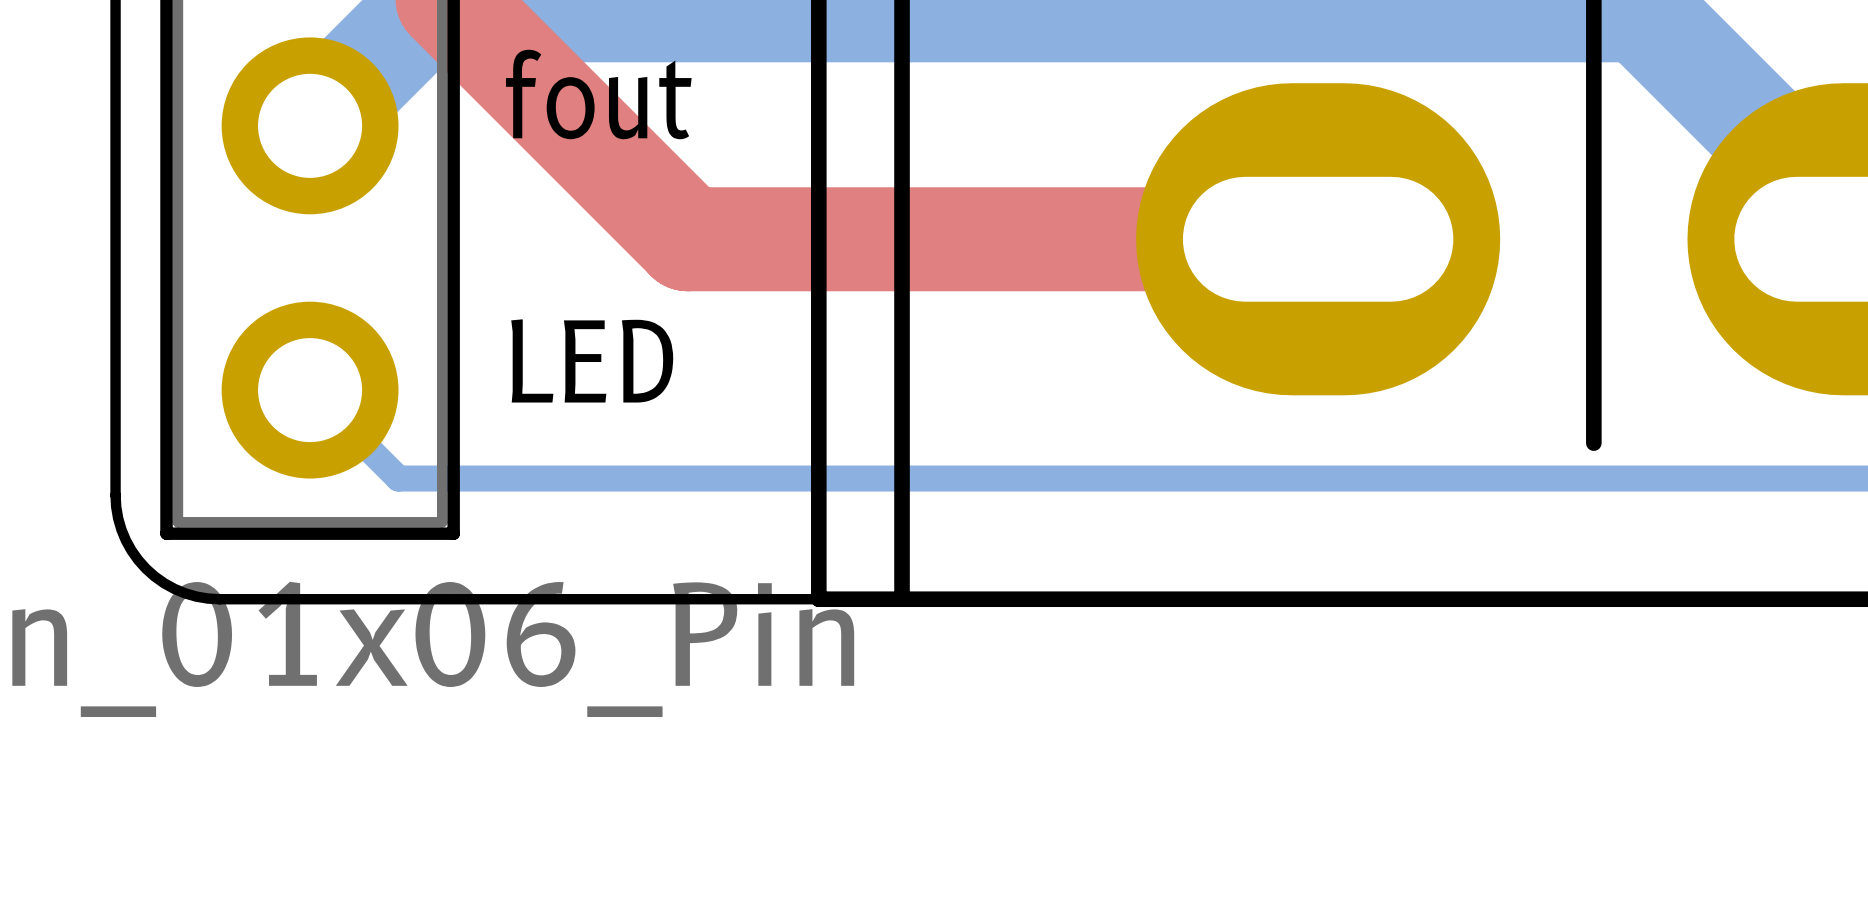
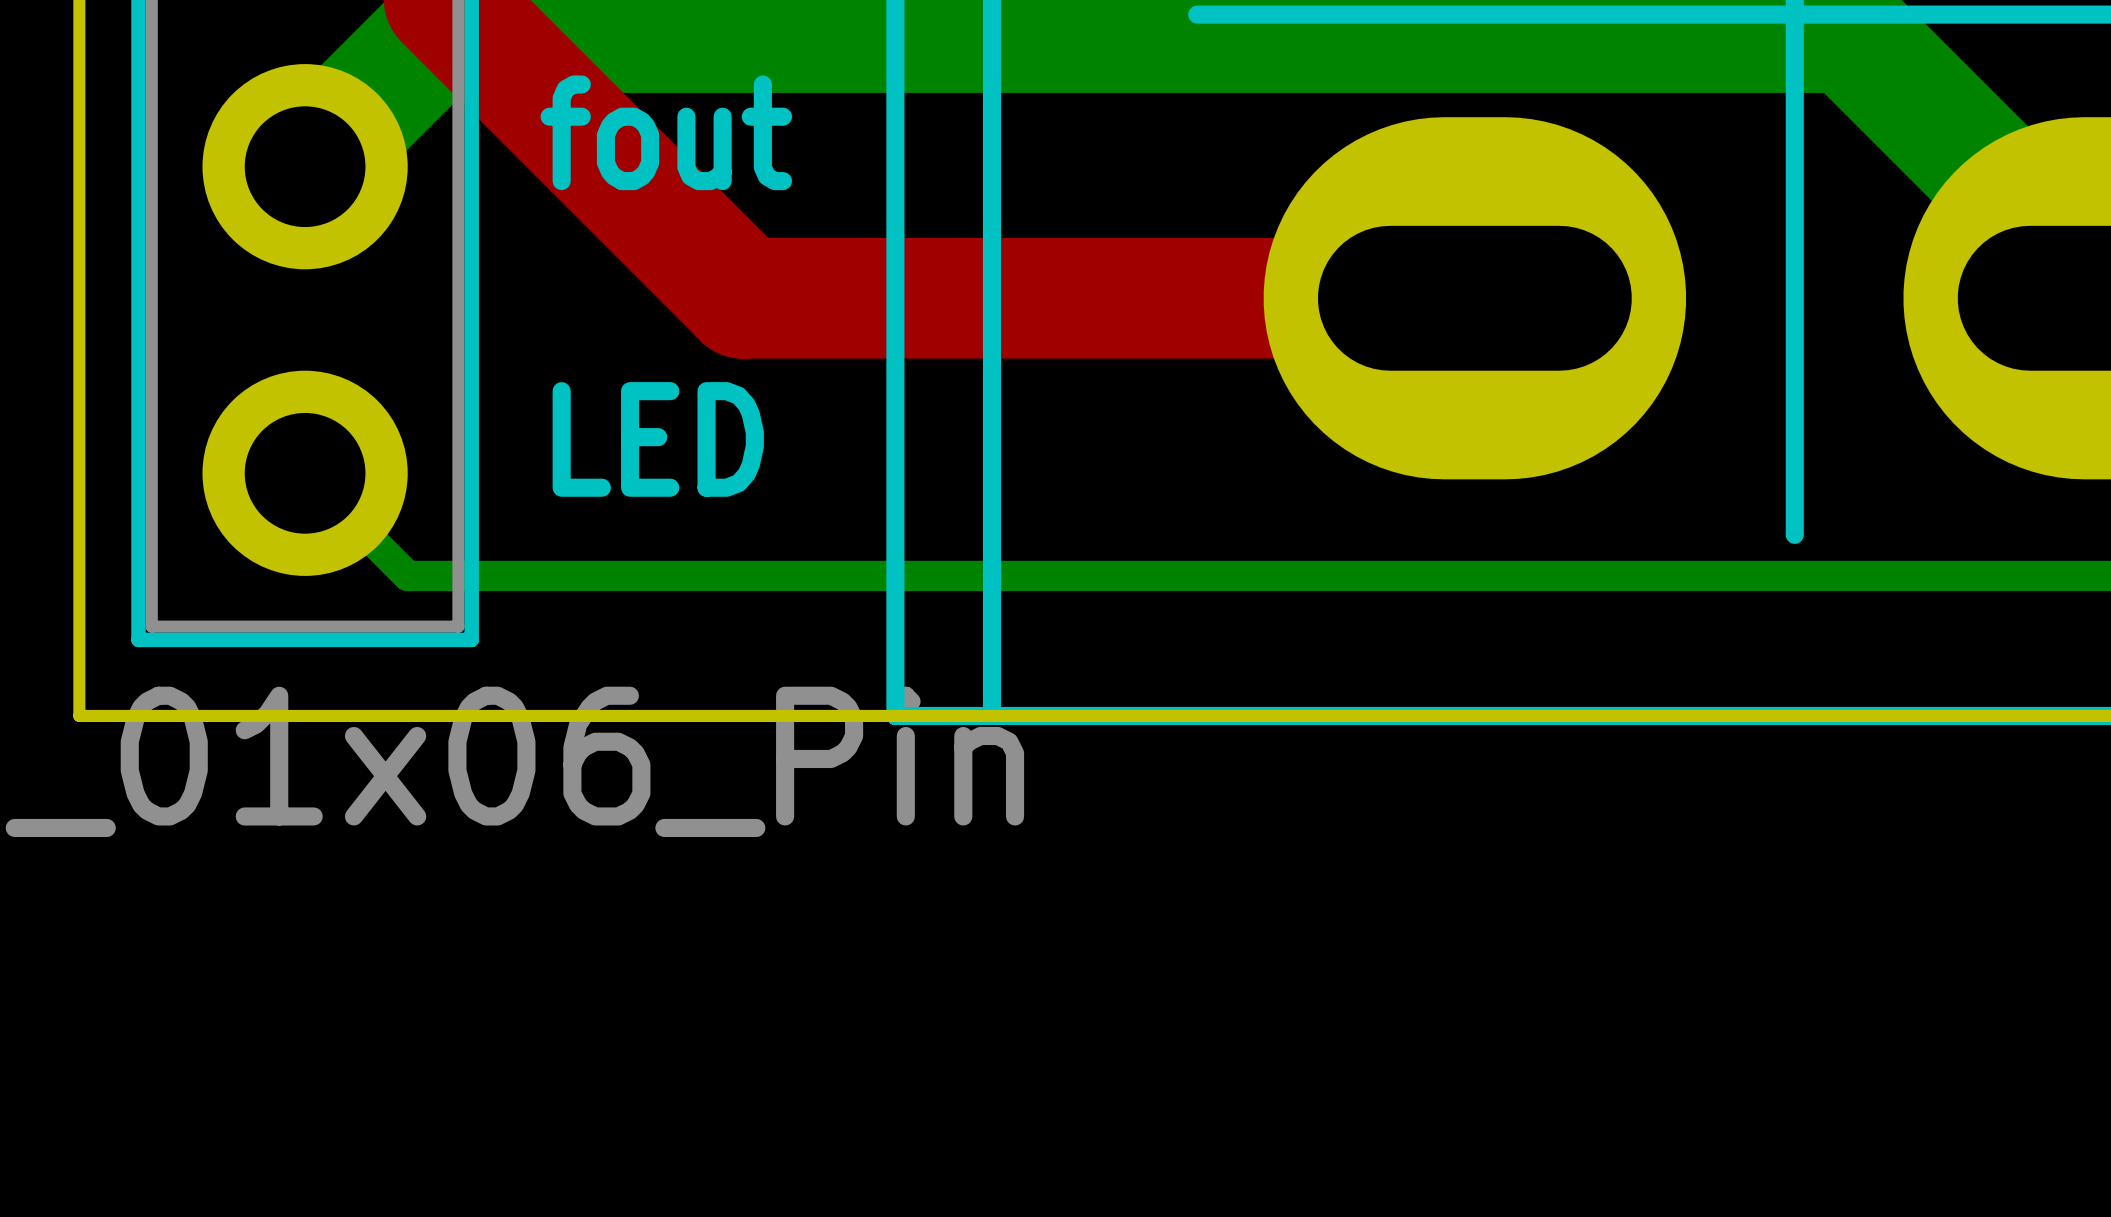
board edge: (115, 495) (118, 518) (125, 540) (146, 568) (164, 583) (185, 593) (219, 599) -> (79, 595) (79, 715) (200, 715)

